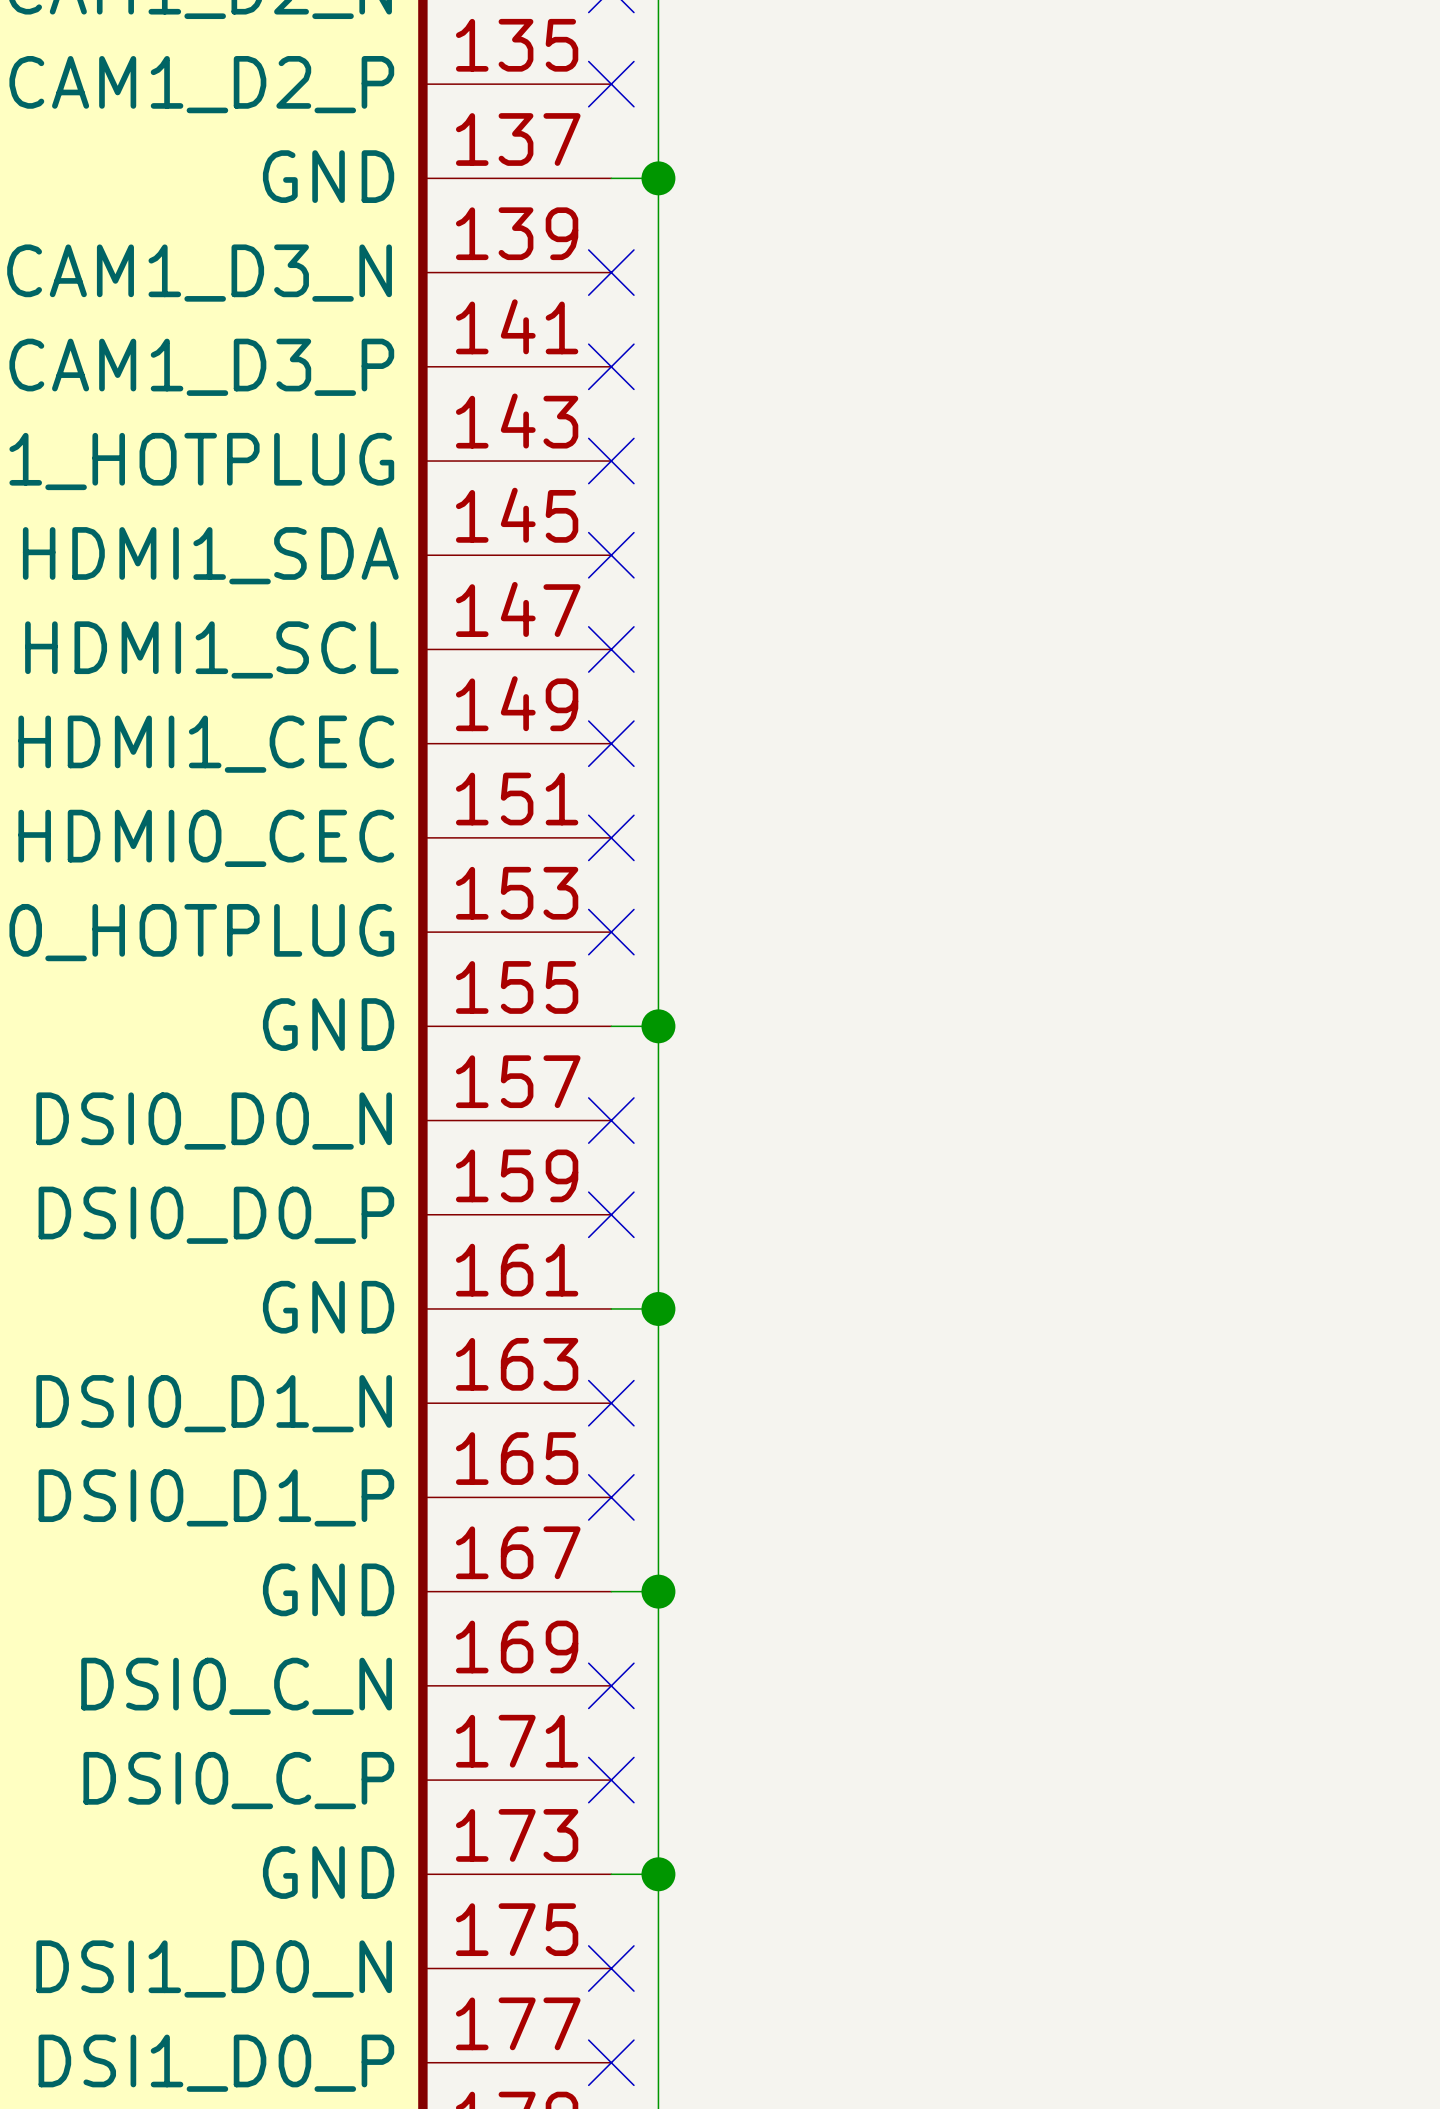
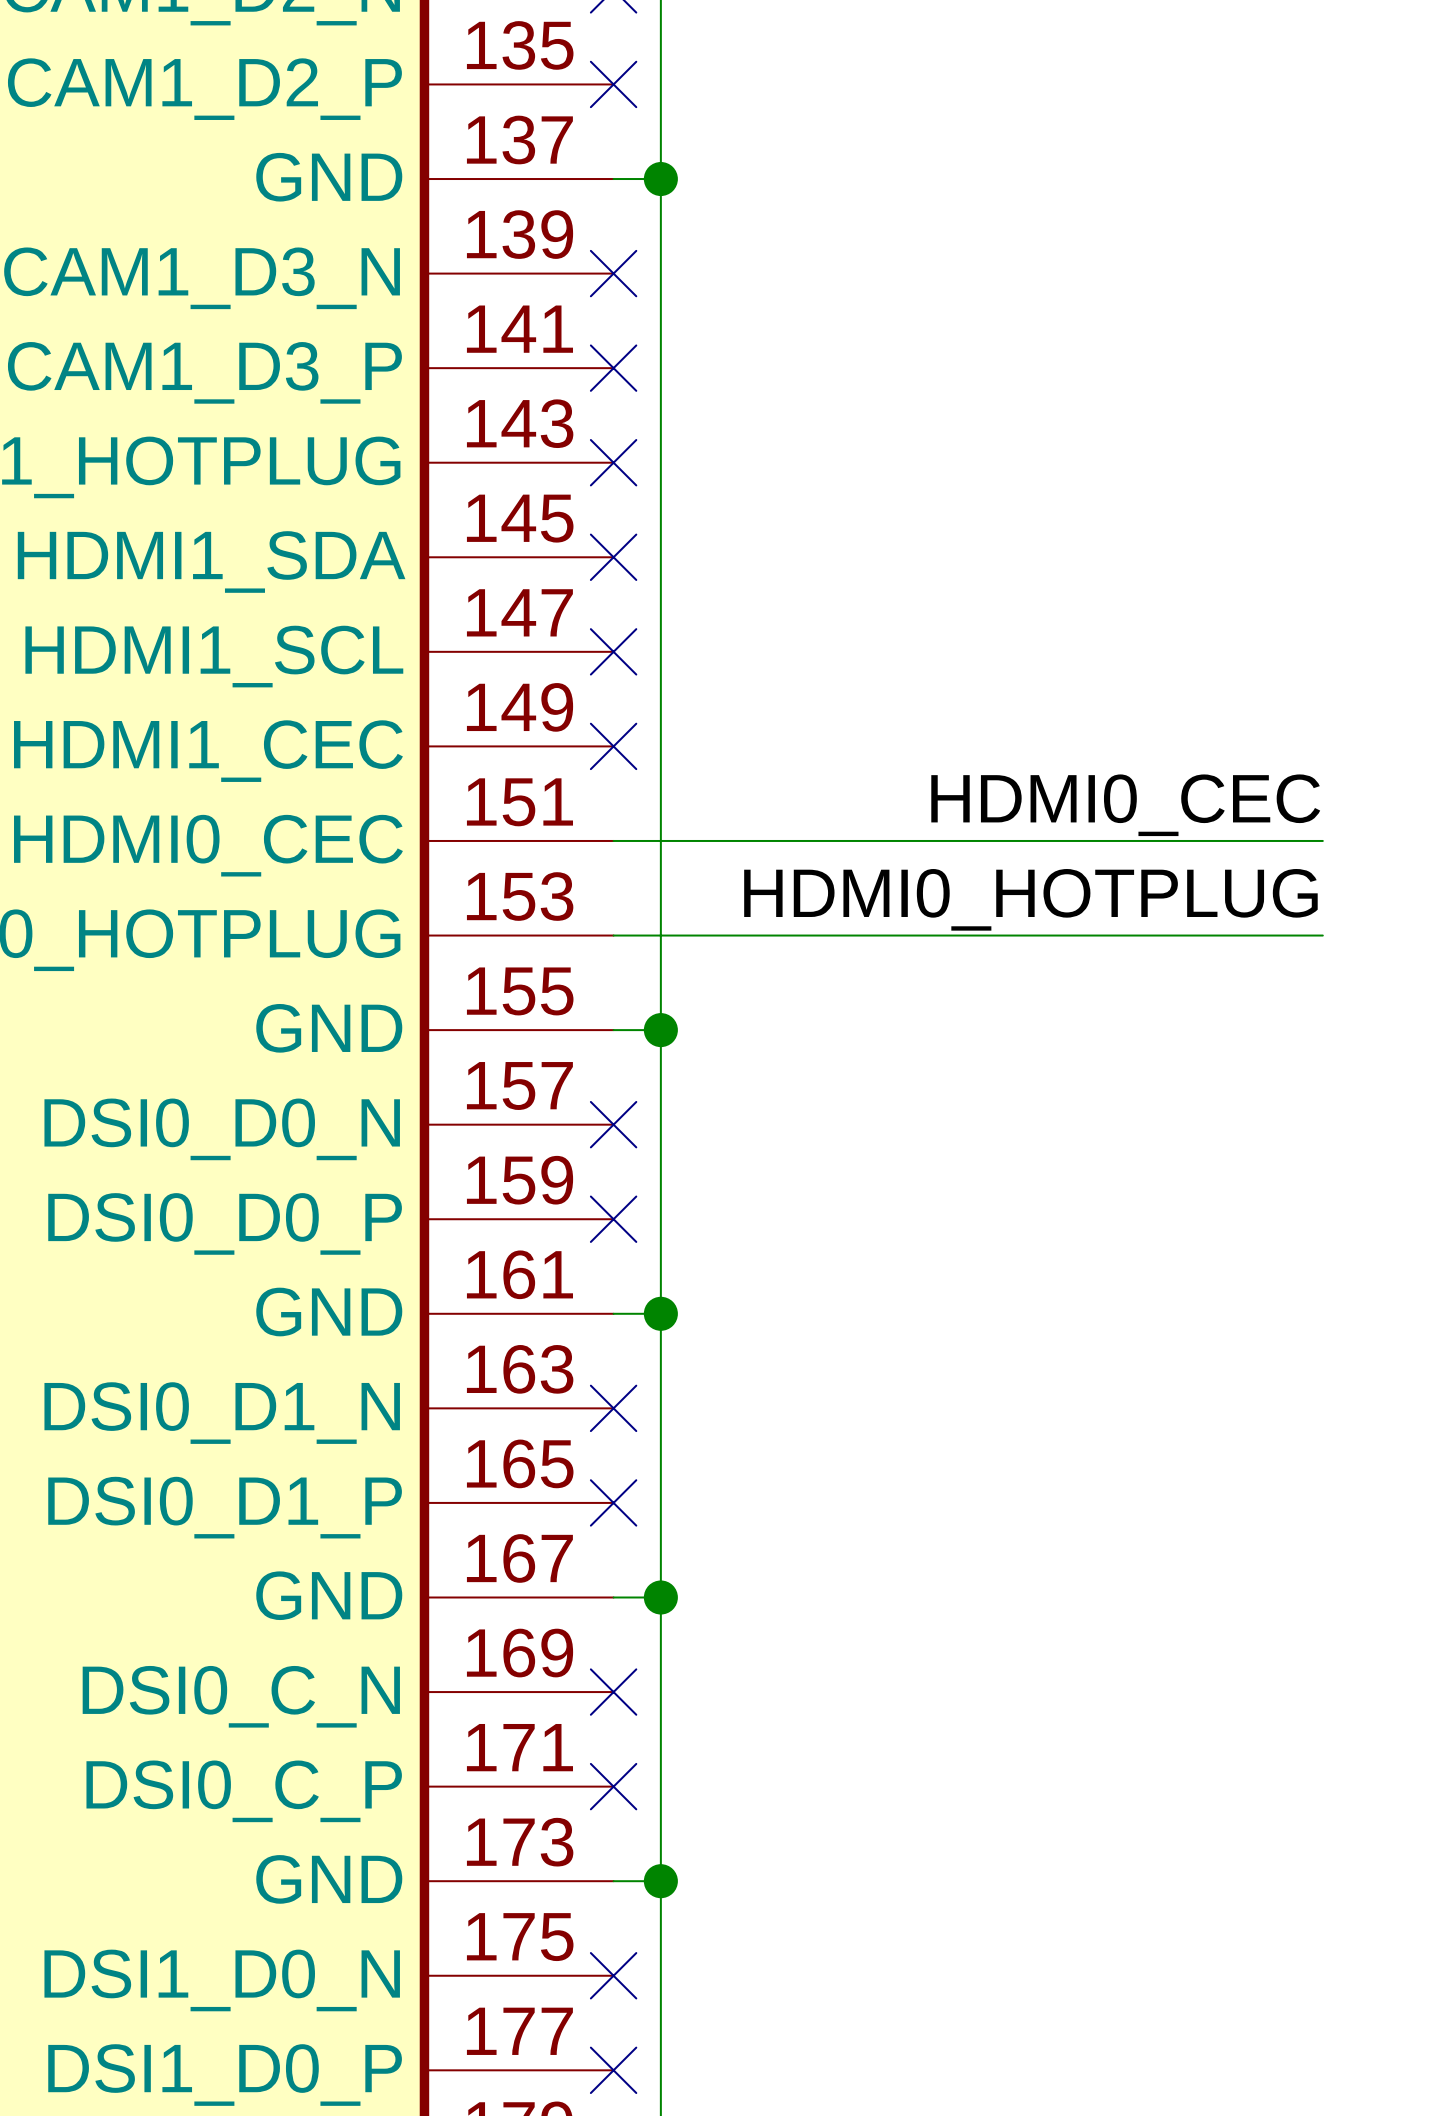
label: none -> HDMI0_CEC (1125, 805)
wire: none -> (613, 840) (1322, 840)
no-connect mark: (611, 837) -> none
label: none -> HDMI0_HOTPLUG (1030, 899)
wire: none -> (613, 935) (1322, 935)
no-connect mark: (611, 932) -> none

